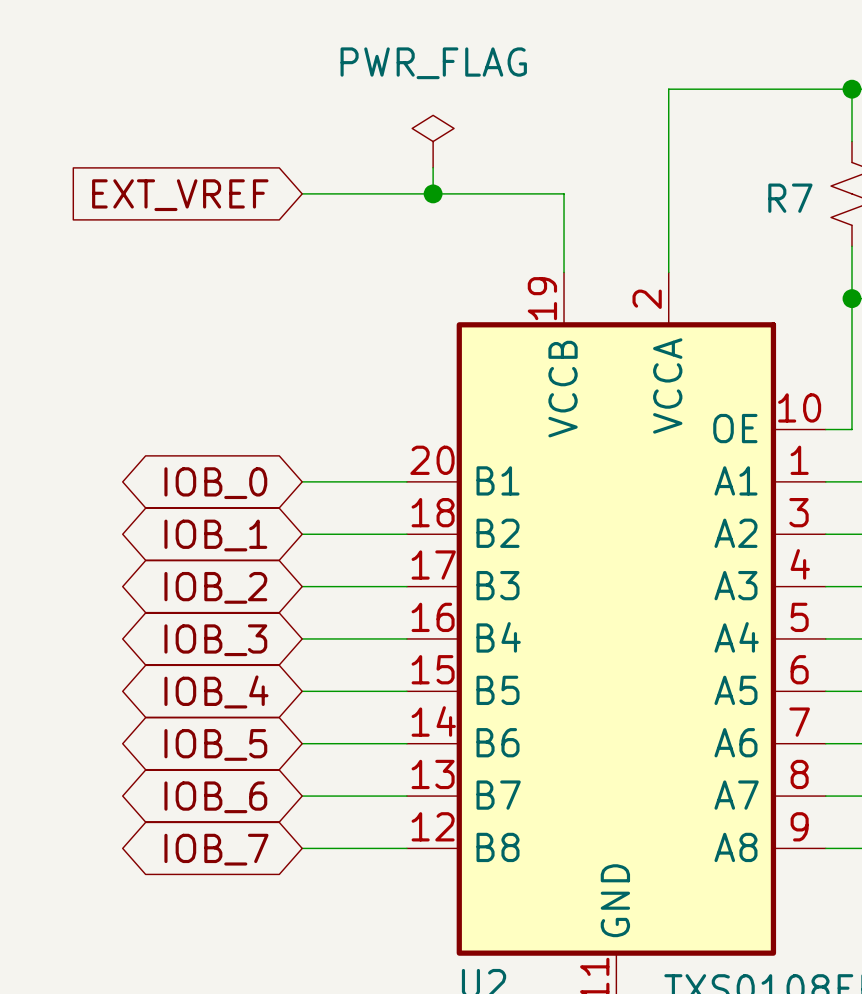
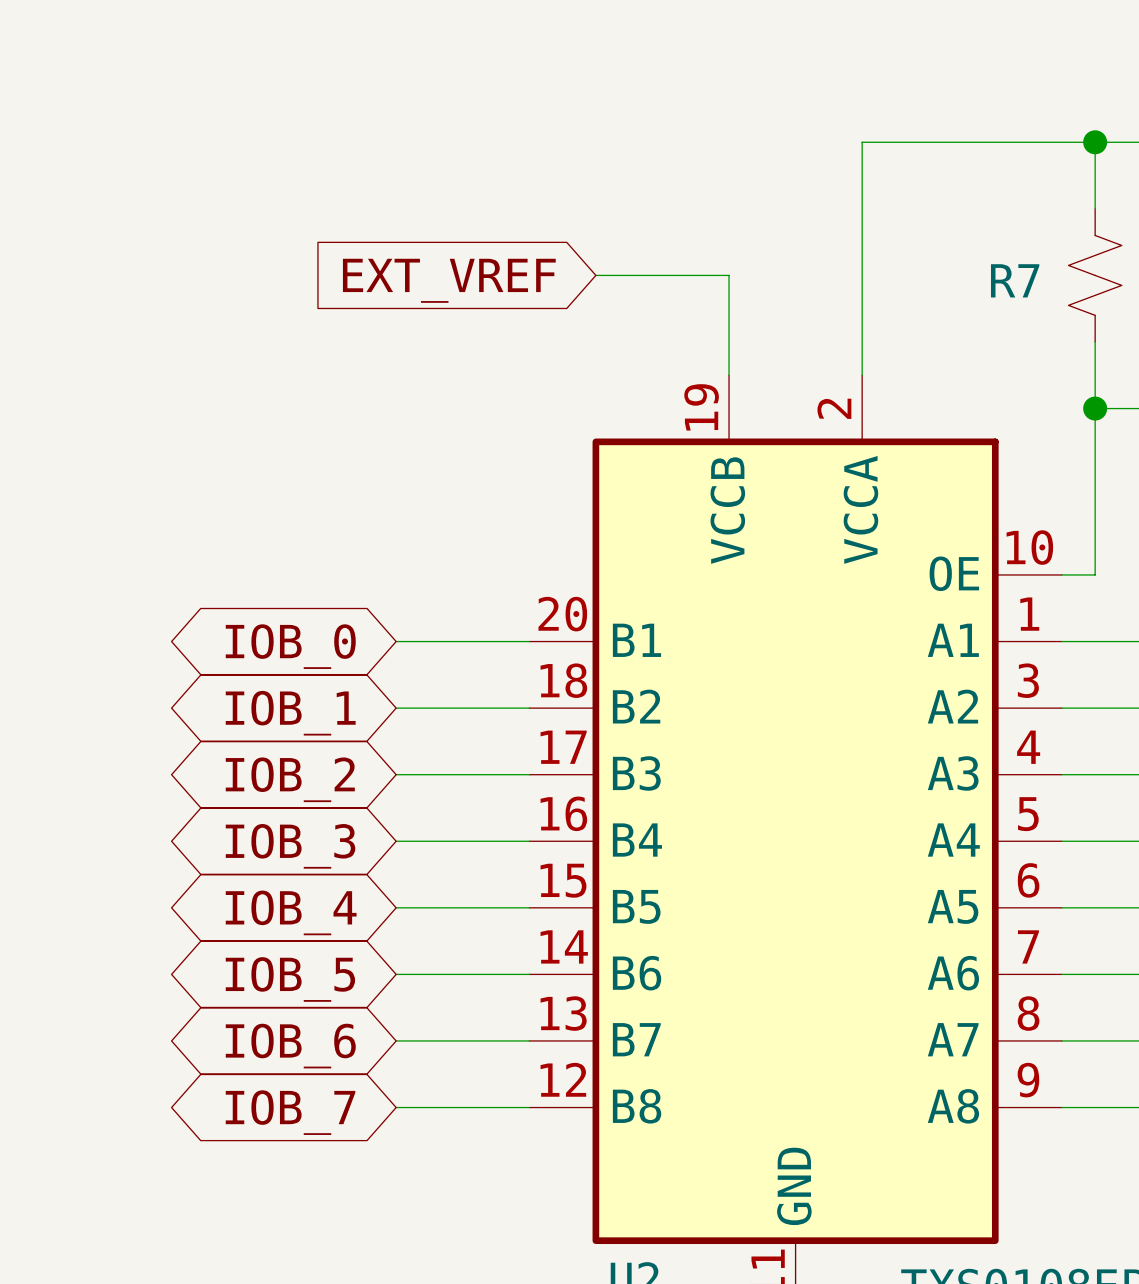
power symbol: PWR_FLAG (433, 141) -> none
wire: (433, 167) (433, 193) -> none
wire: (302, 193) (459, 193) -> none
junction: (433, 193) -> none
global label position: EXT_VREF (180, 195) -> EXT_VREF (449, 280)

